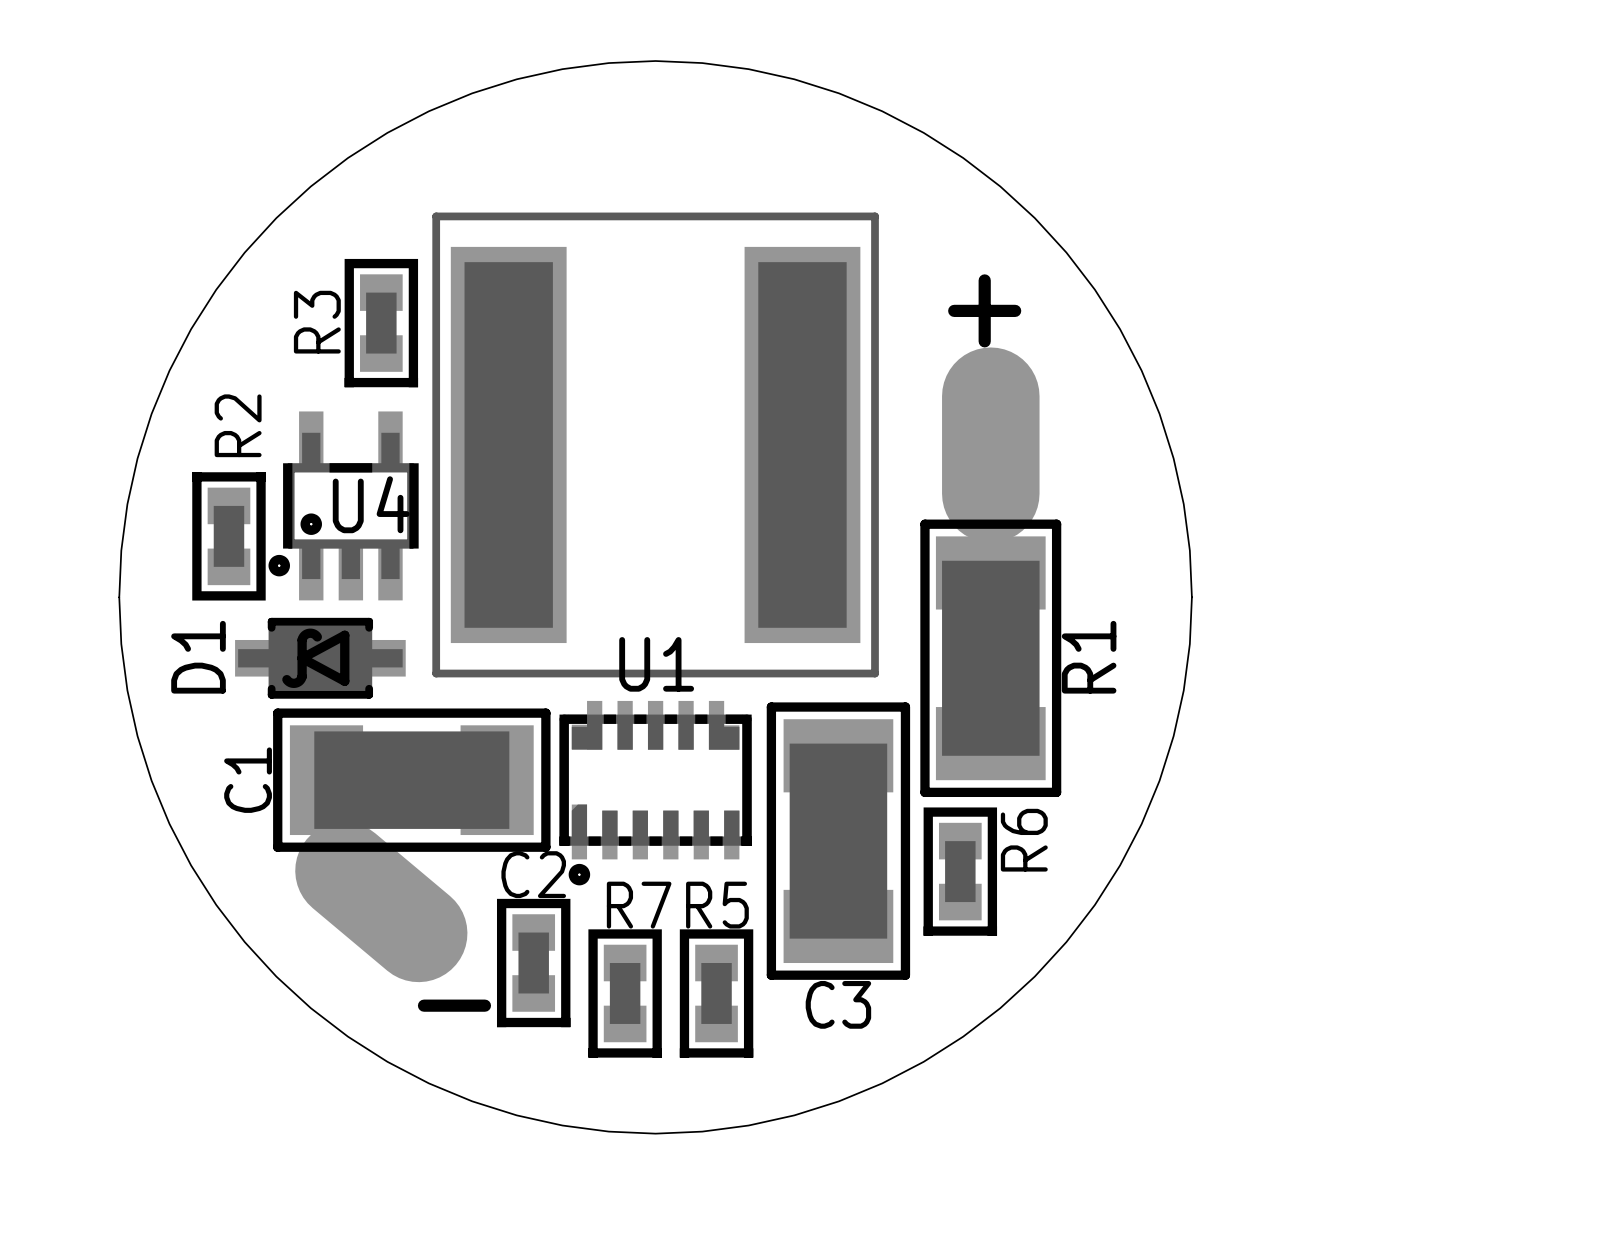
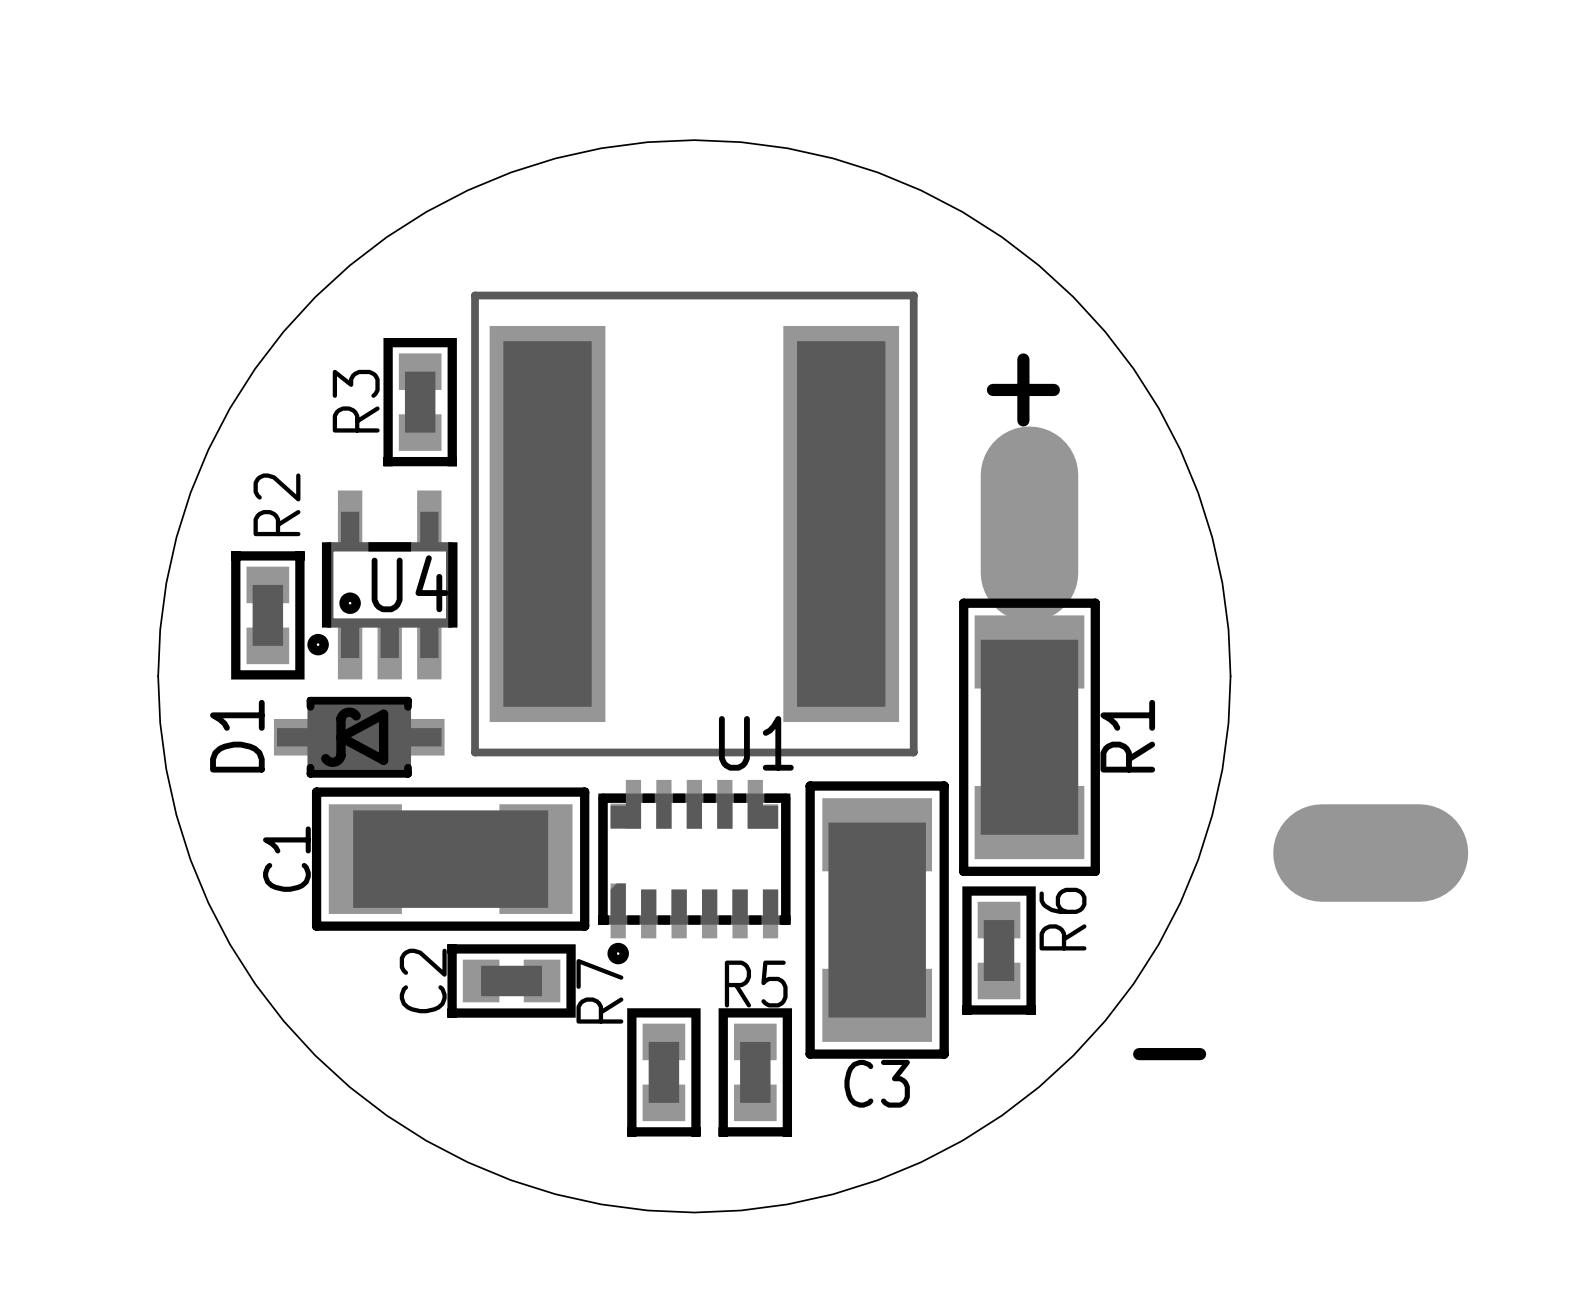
U1 name position: U1 (656, 664) -> U1 (756, 743)
part: none -> (1370, 853)
part: (381, 902) -> none
R7 name rotation: 0° (639, 905) -> 90° counterclockwise (599, 991)
C2 rotation: 0° (533, 963) -> 90° clockwise (511, 980)
C2 position: (533, 963) -> (511, 980)
line: (424, 1005) (484, 1005) -> (1139, 1054) (1200, 1054)

